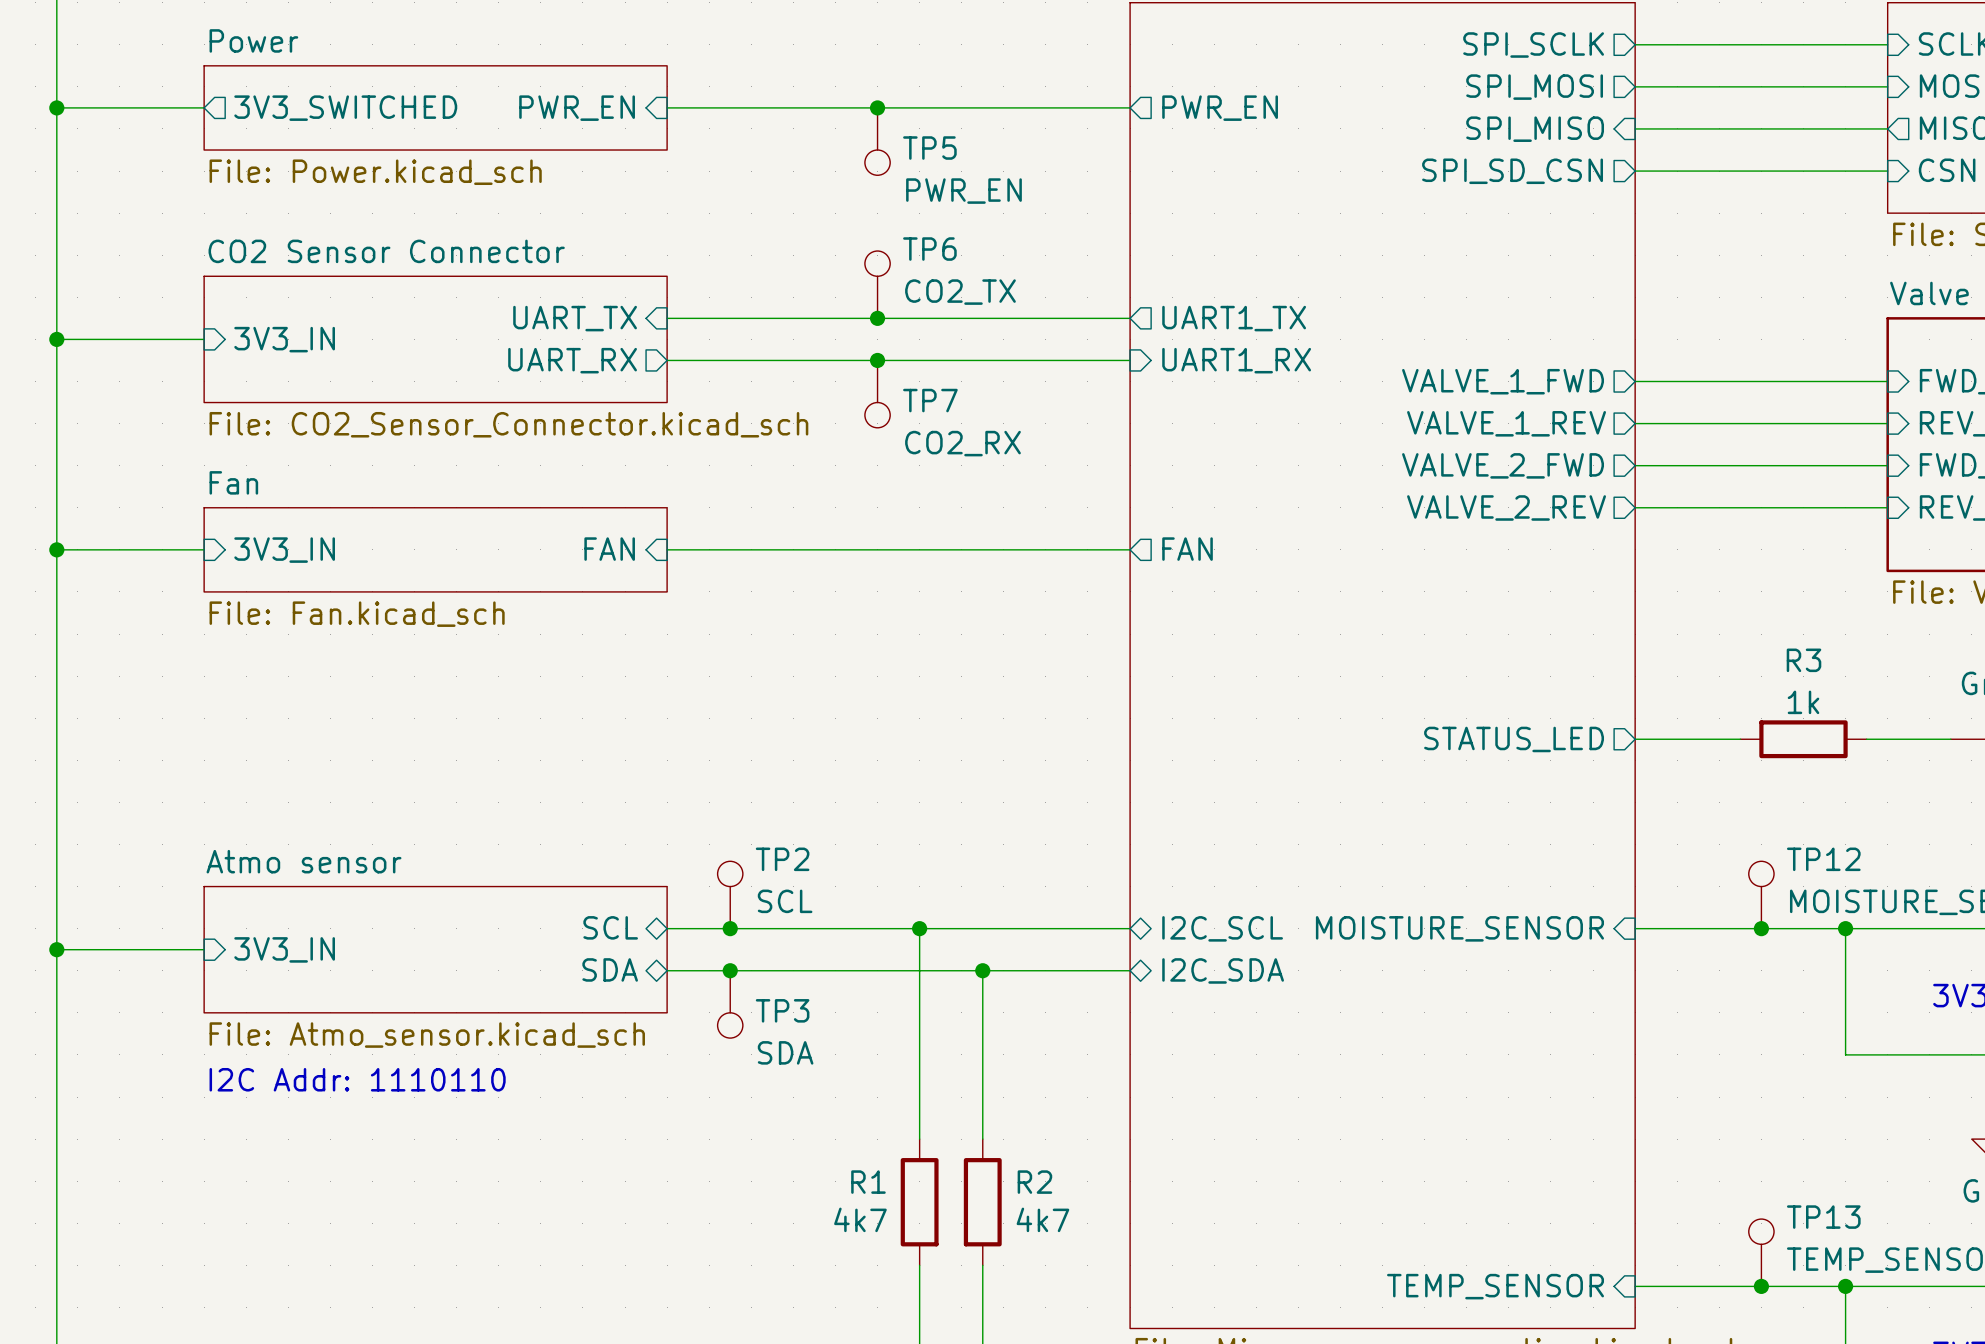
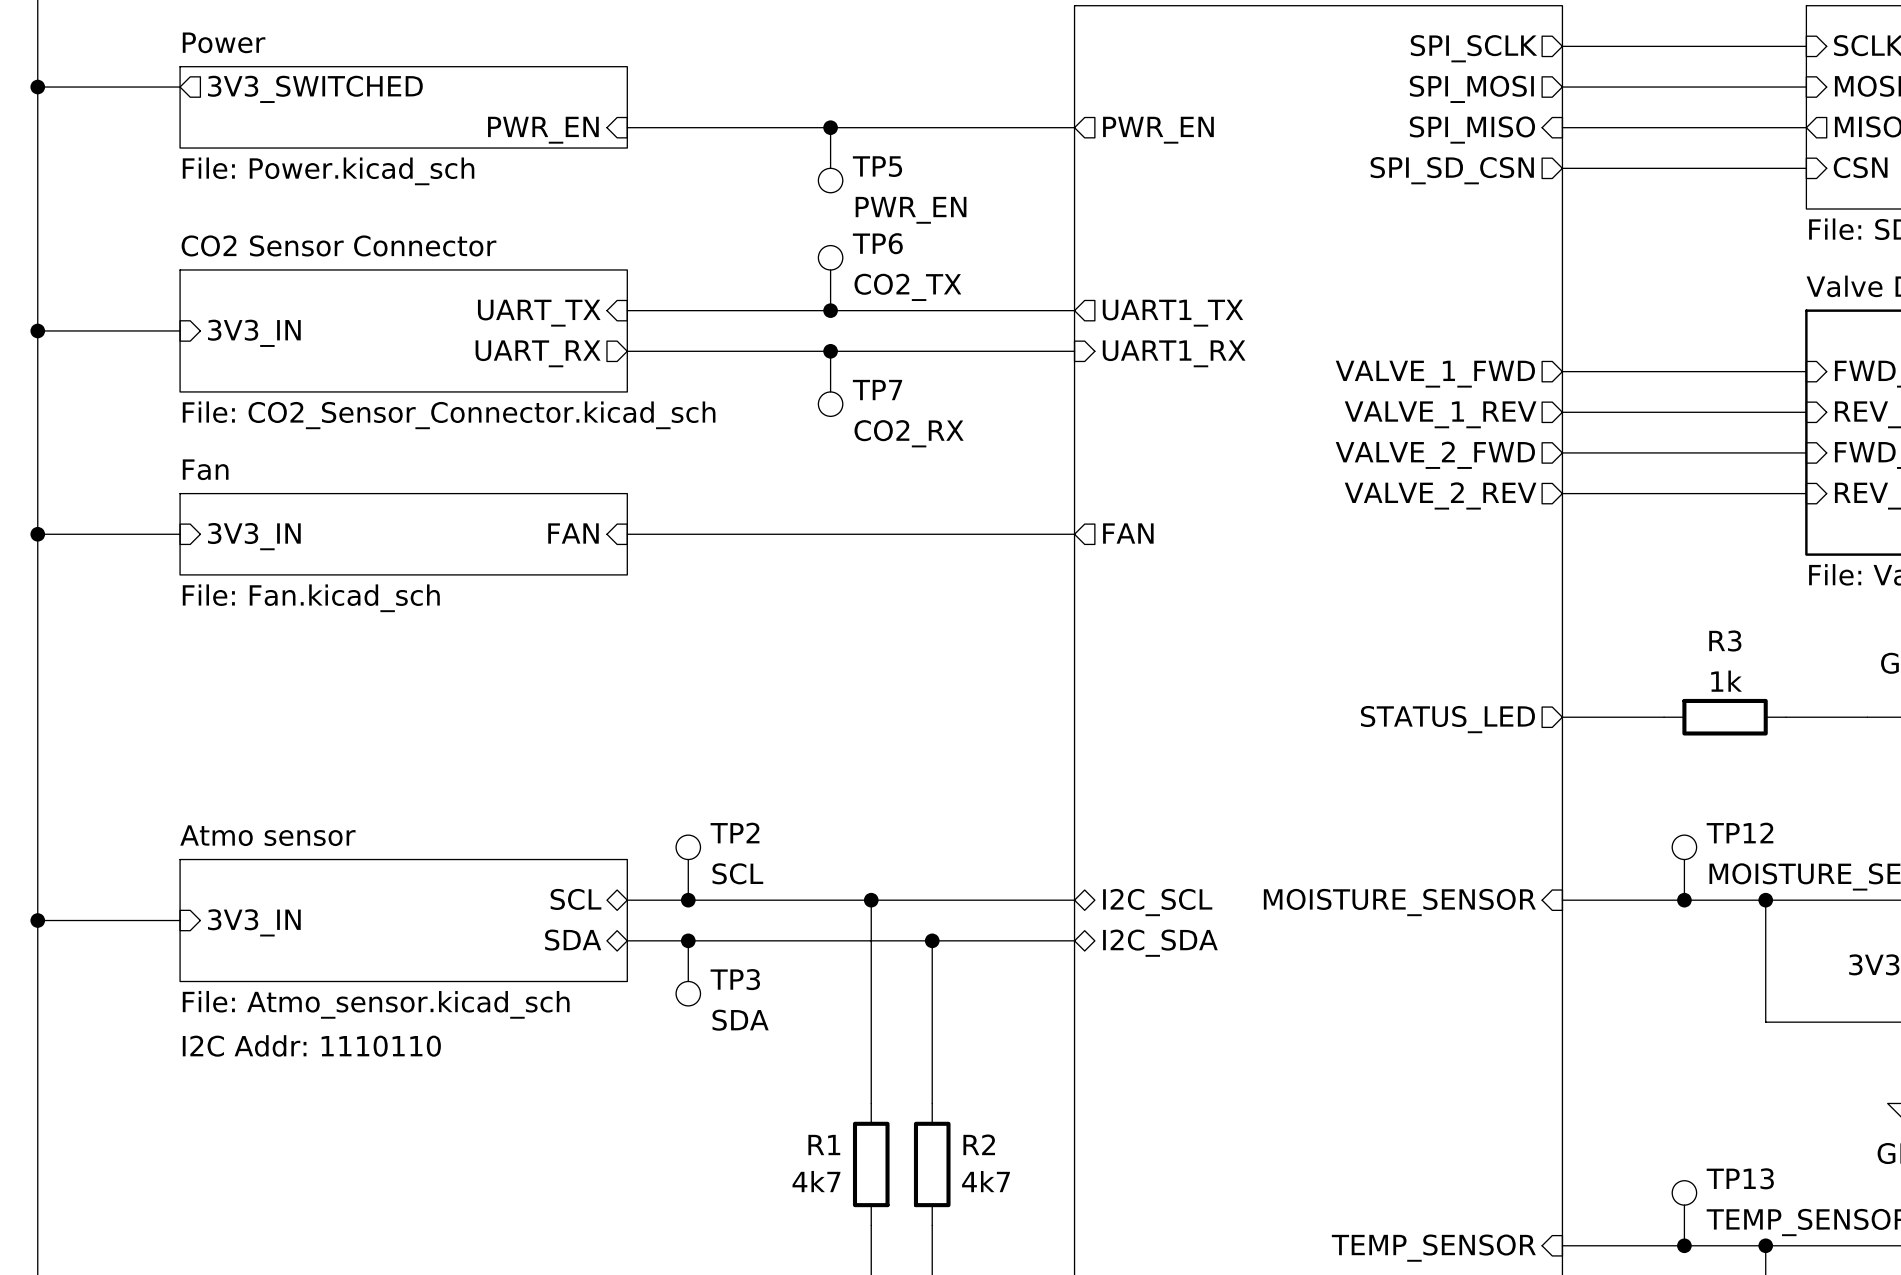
wire: (56, 107) (204, 107) -> (37, 87) (180, 87)
junction position: (56, 107) -> (37, 87)
wire: (667, 107) (1130, 107) -> (627, 127) (1074, 127)
junction position: (877, 107) -> (830, 127)
sheet pin position: 3V3_SWITCHED (345, 108) -> 3V3_SWITCHED (315, 89)
sheet pin position: PWR_EN (577, 108) -> PWR_EN (543, 130)
sheet pin position: PWR_EN (1220, 108) -> PWR_EN (1158, 130)
TP5 position: (877, 141) -> (830, 160)

